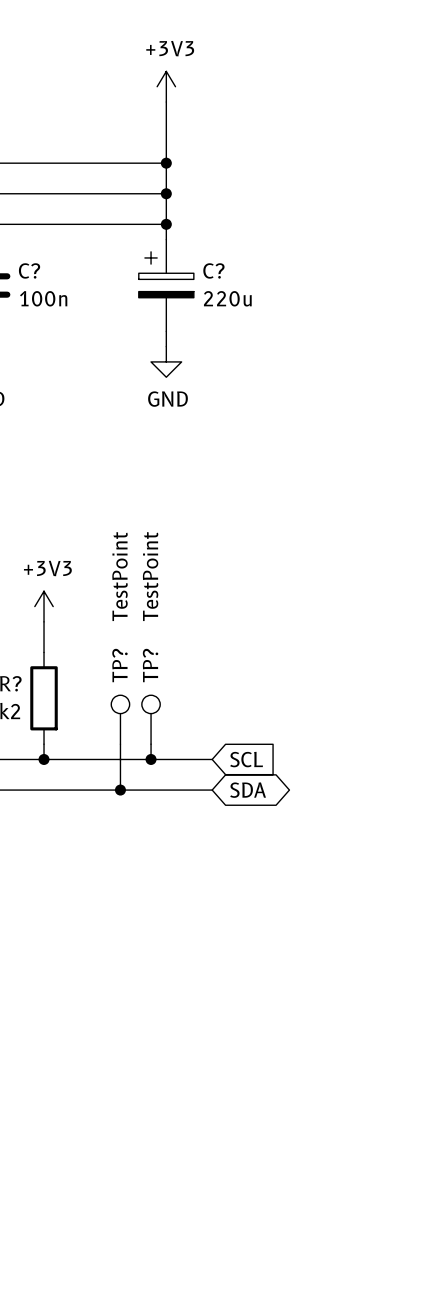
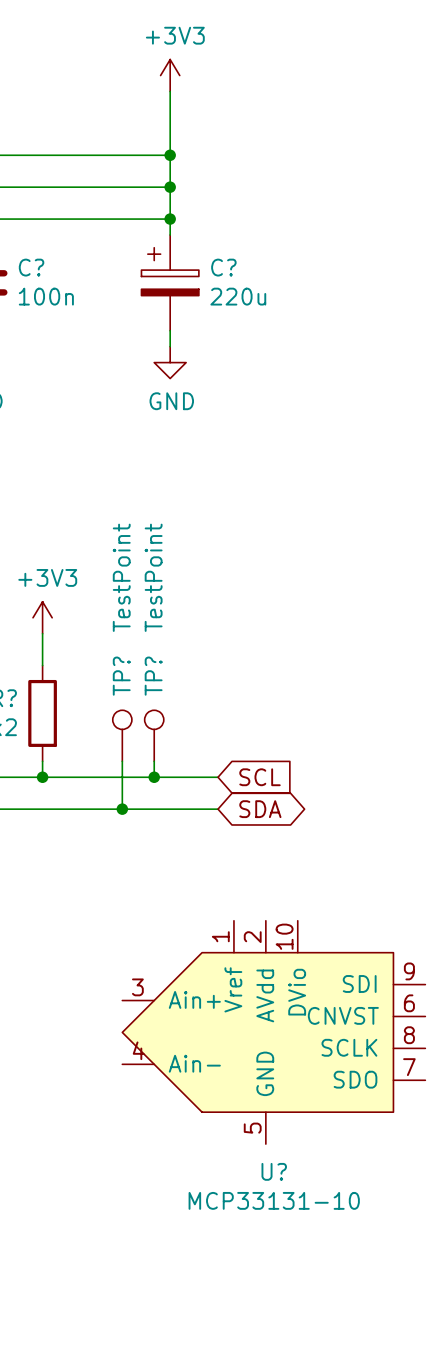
U?: none -> MCP33131-10 (273, 1032)

